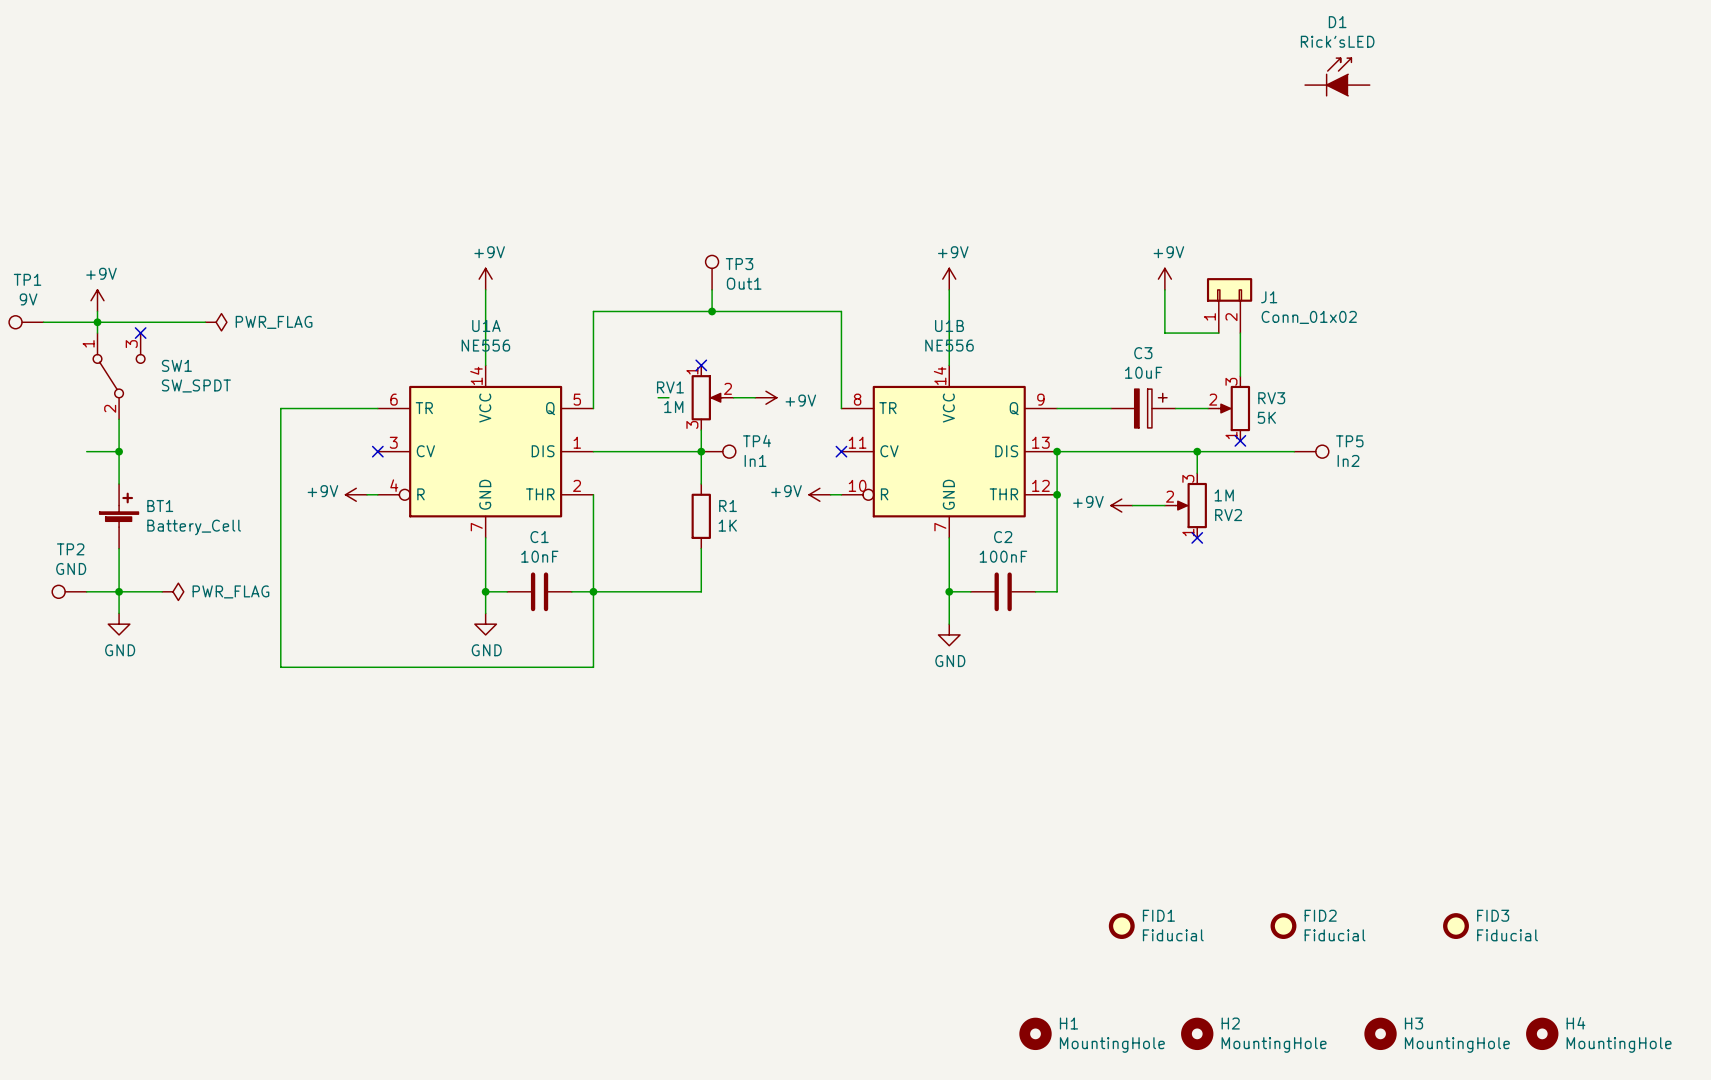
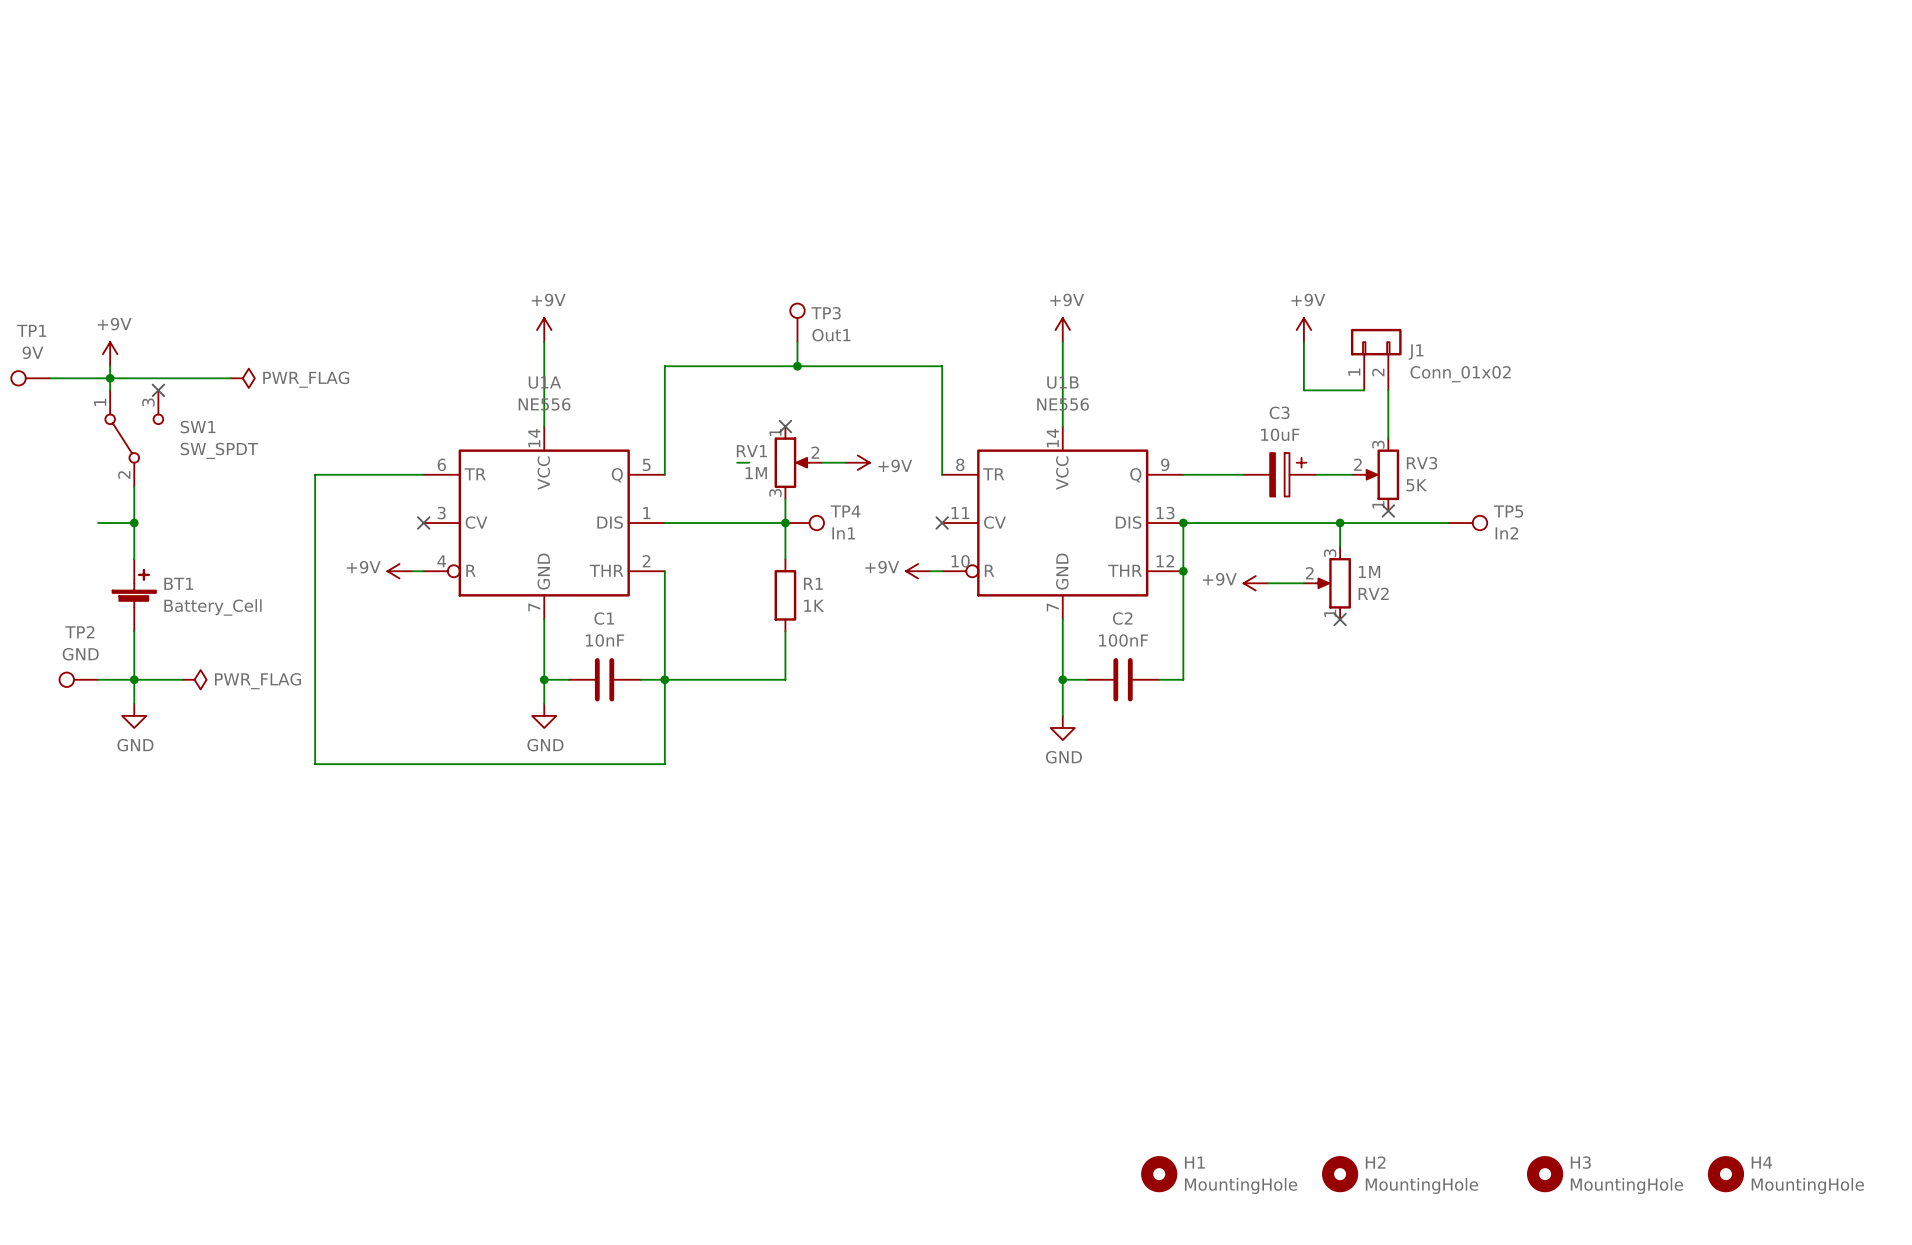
D1: Rick'sLED (1337, 77) -> none
FID1: Fiducial (1121, 926) -> none
FID2: Fiducial (1283, 926) -> none
FID3: Fiducial (1456, 926) -> none

